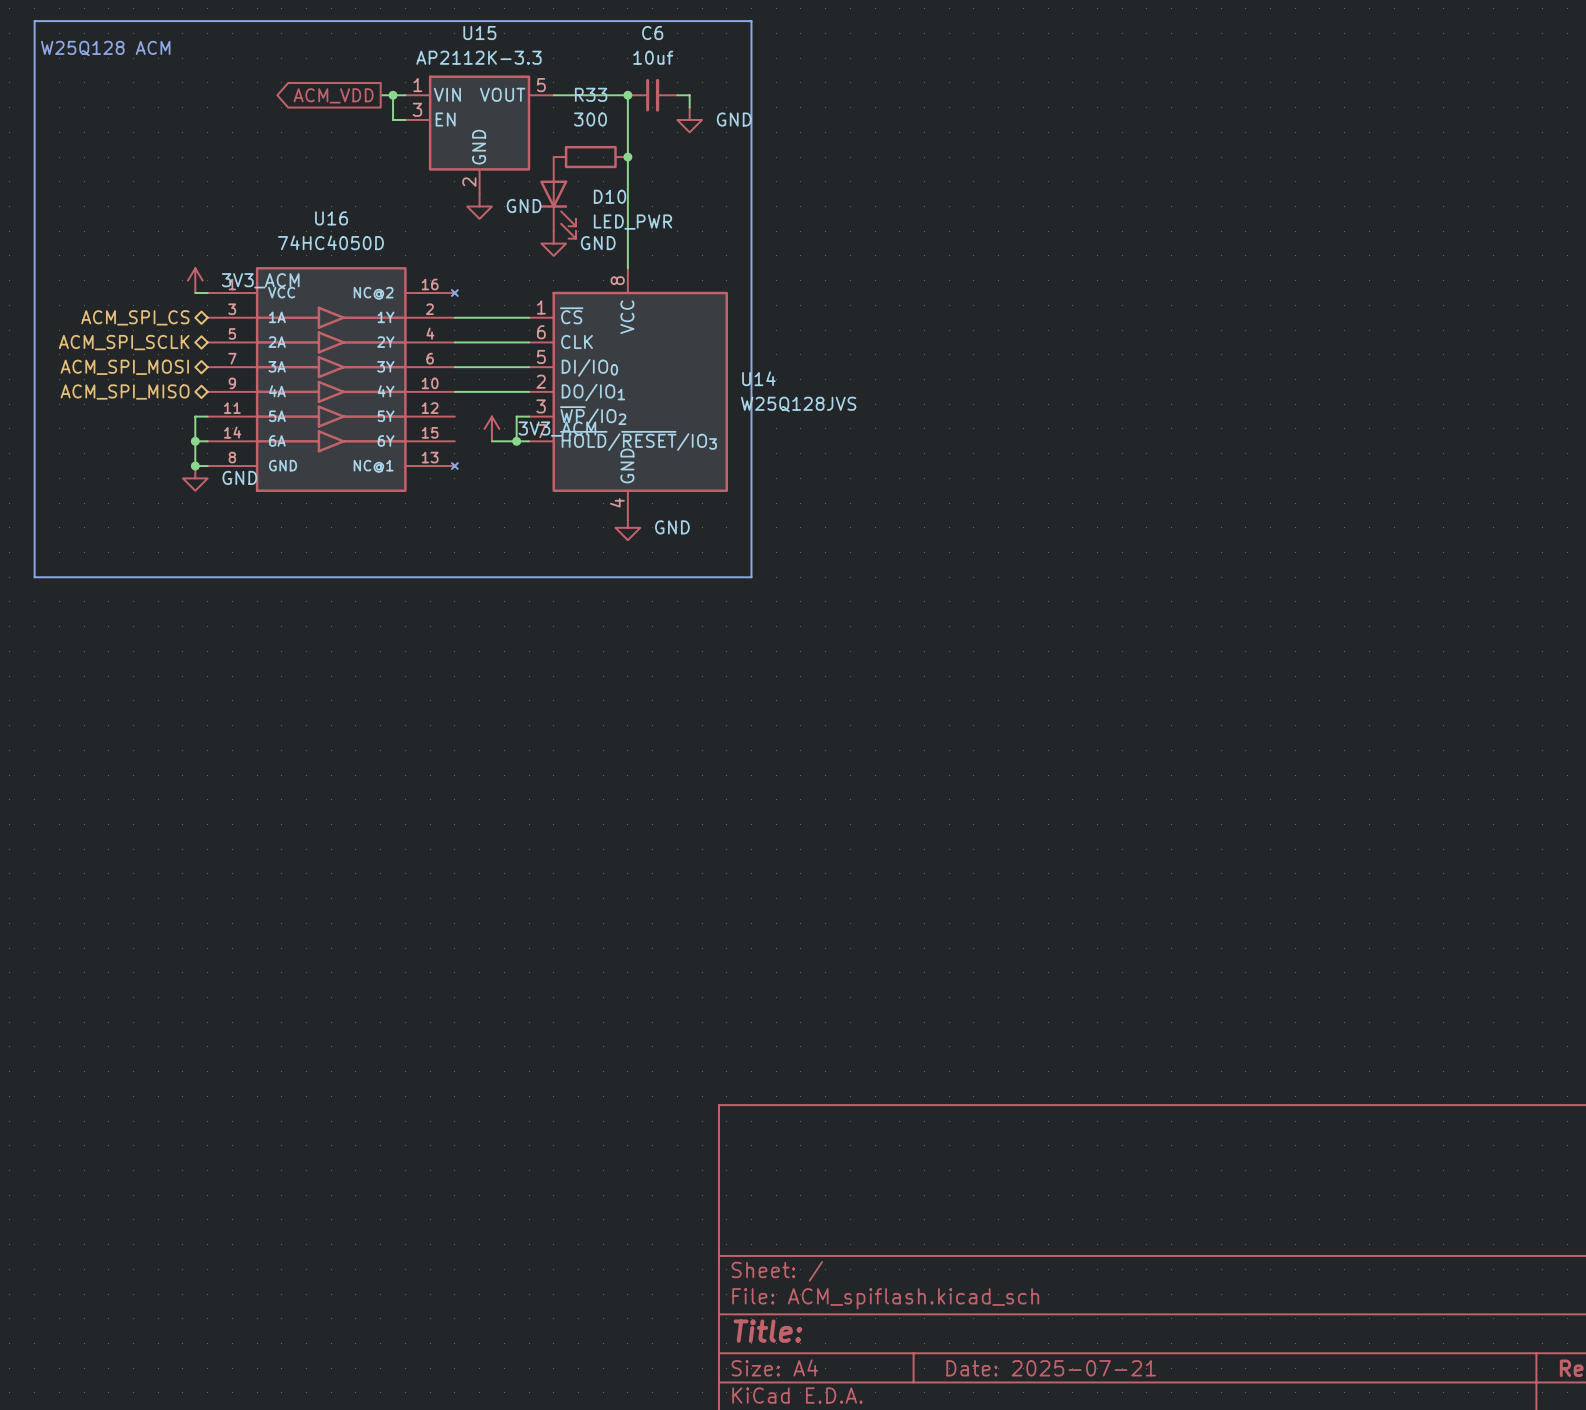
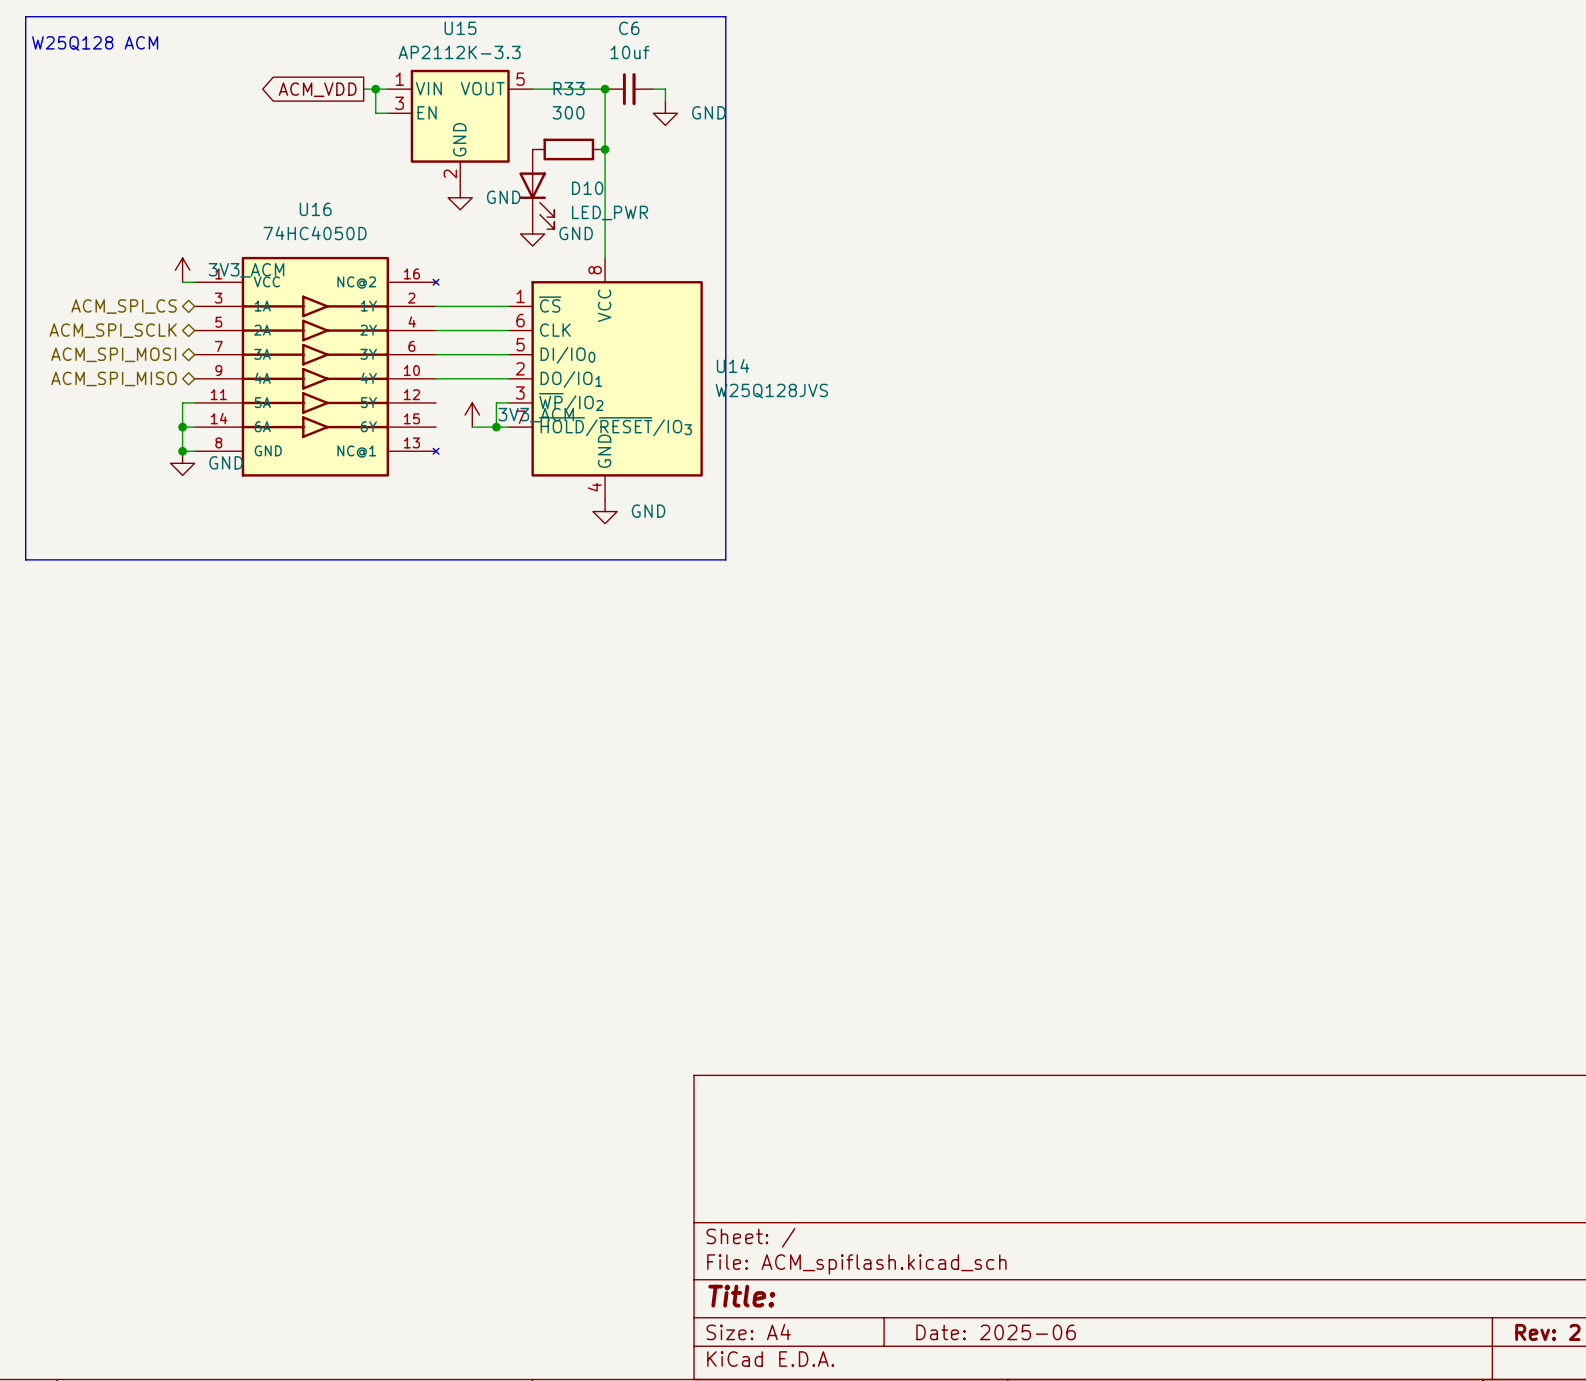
title block: Date: 2025-07-21 (1051, 1368) -> Date: 2025-06 (996, 1332)

